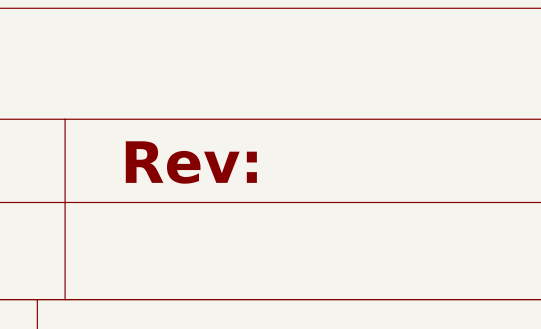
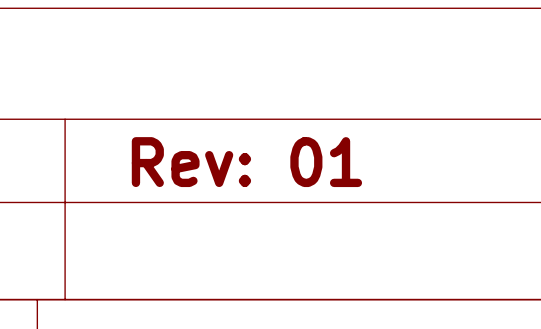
title block: Rev: (191, 162) -> Rev: 01 (246, 162)

